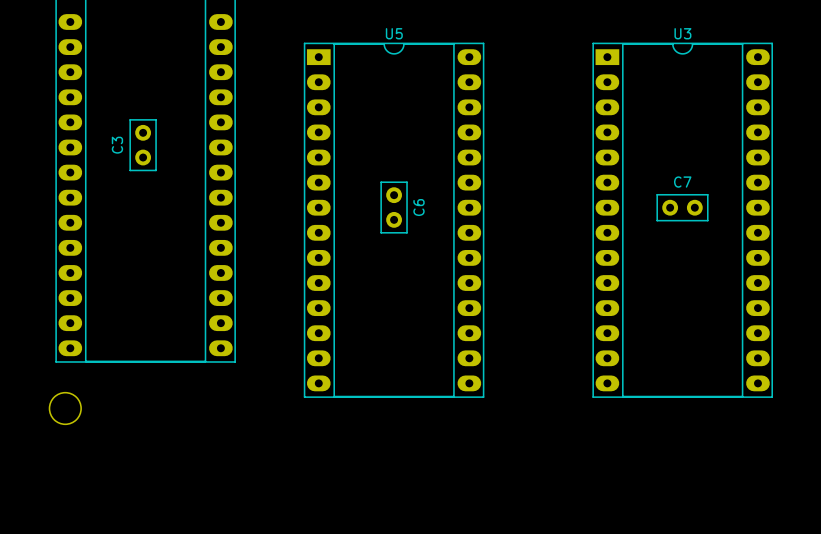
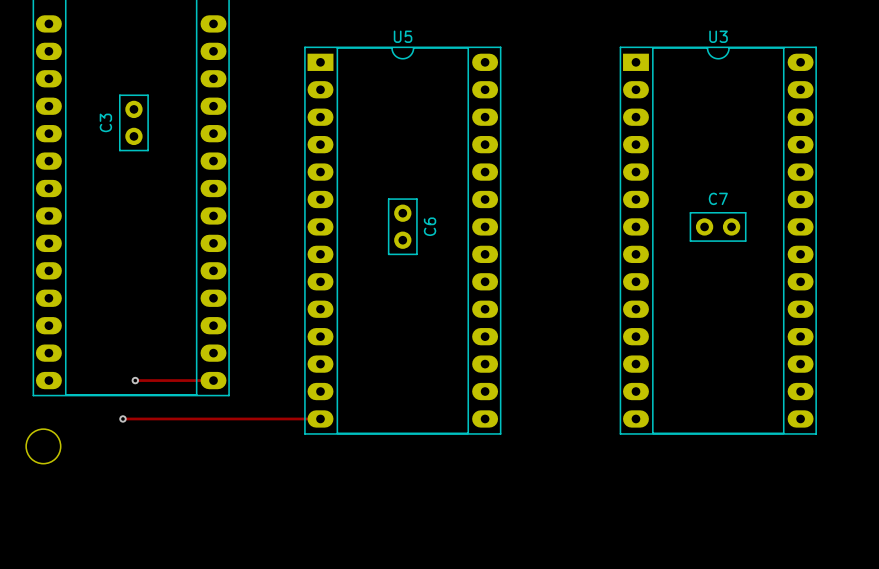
C3 position: (143, 145) -> (133, 122)
track: none -> (135, 380) (213, 380)
via: none -> (135, 380)
track: none -> (122, 418) (320, 418)
via: none -> (122, 418)

